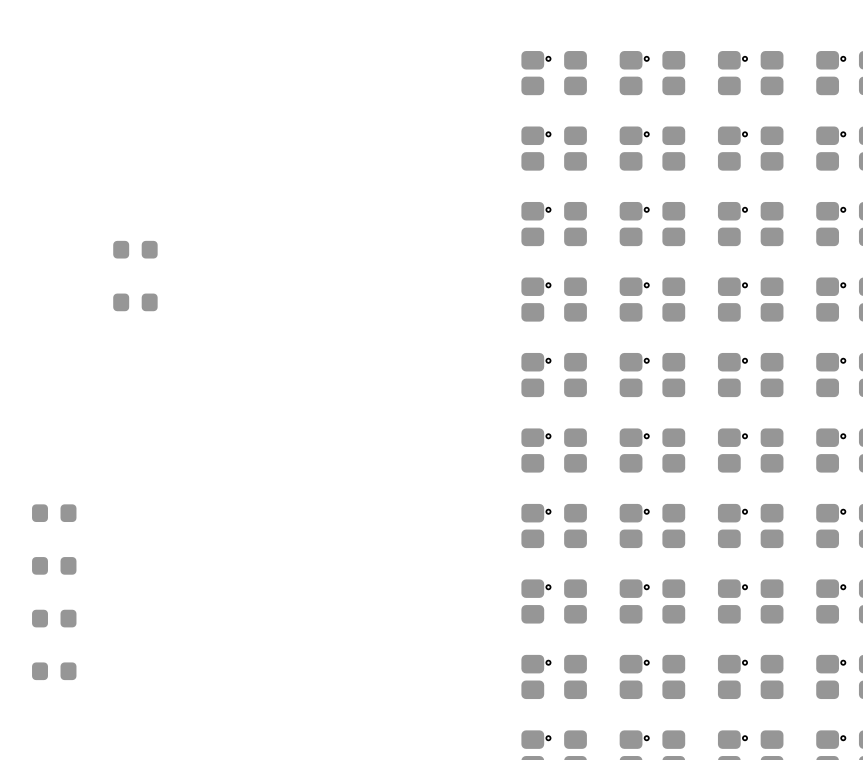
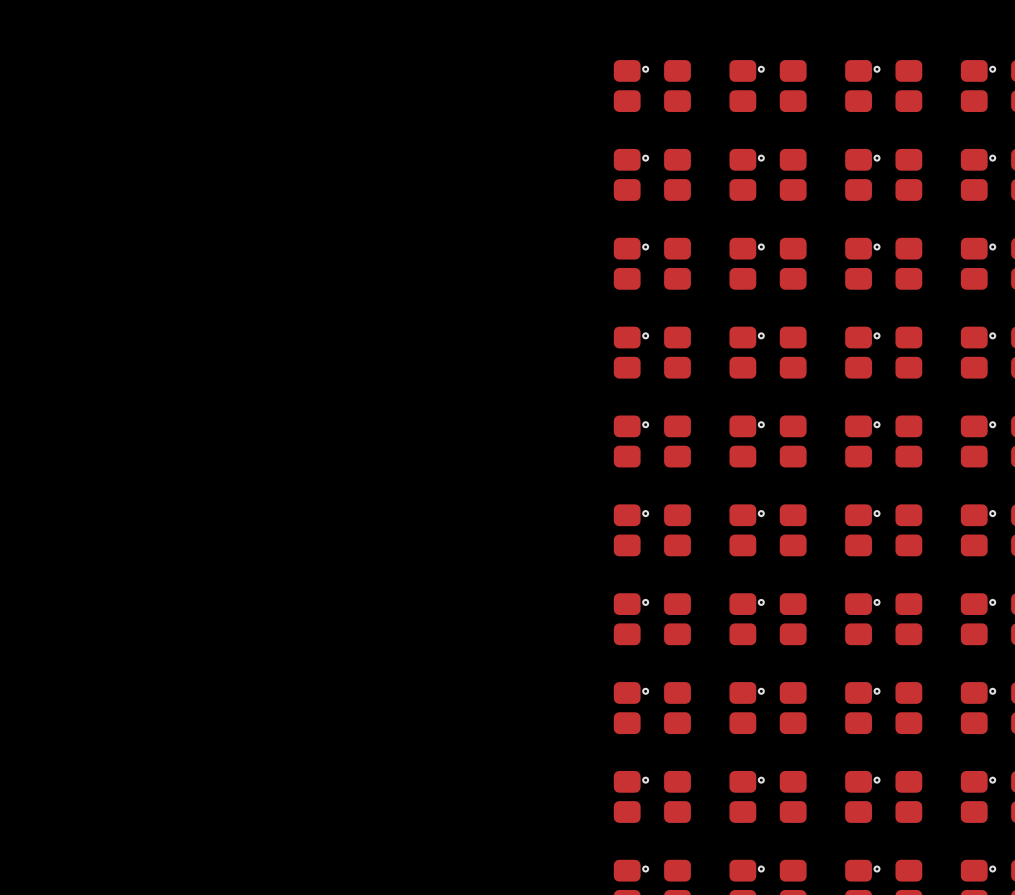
part: (135, 249) -> none
part: (135, 302) -> none
part: (54, 513) -> none
part: (54, 565) -> none
part: (54, 618) -> none
part: (54, 671) -> none

